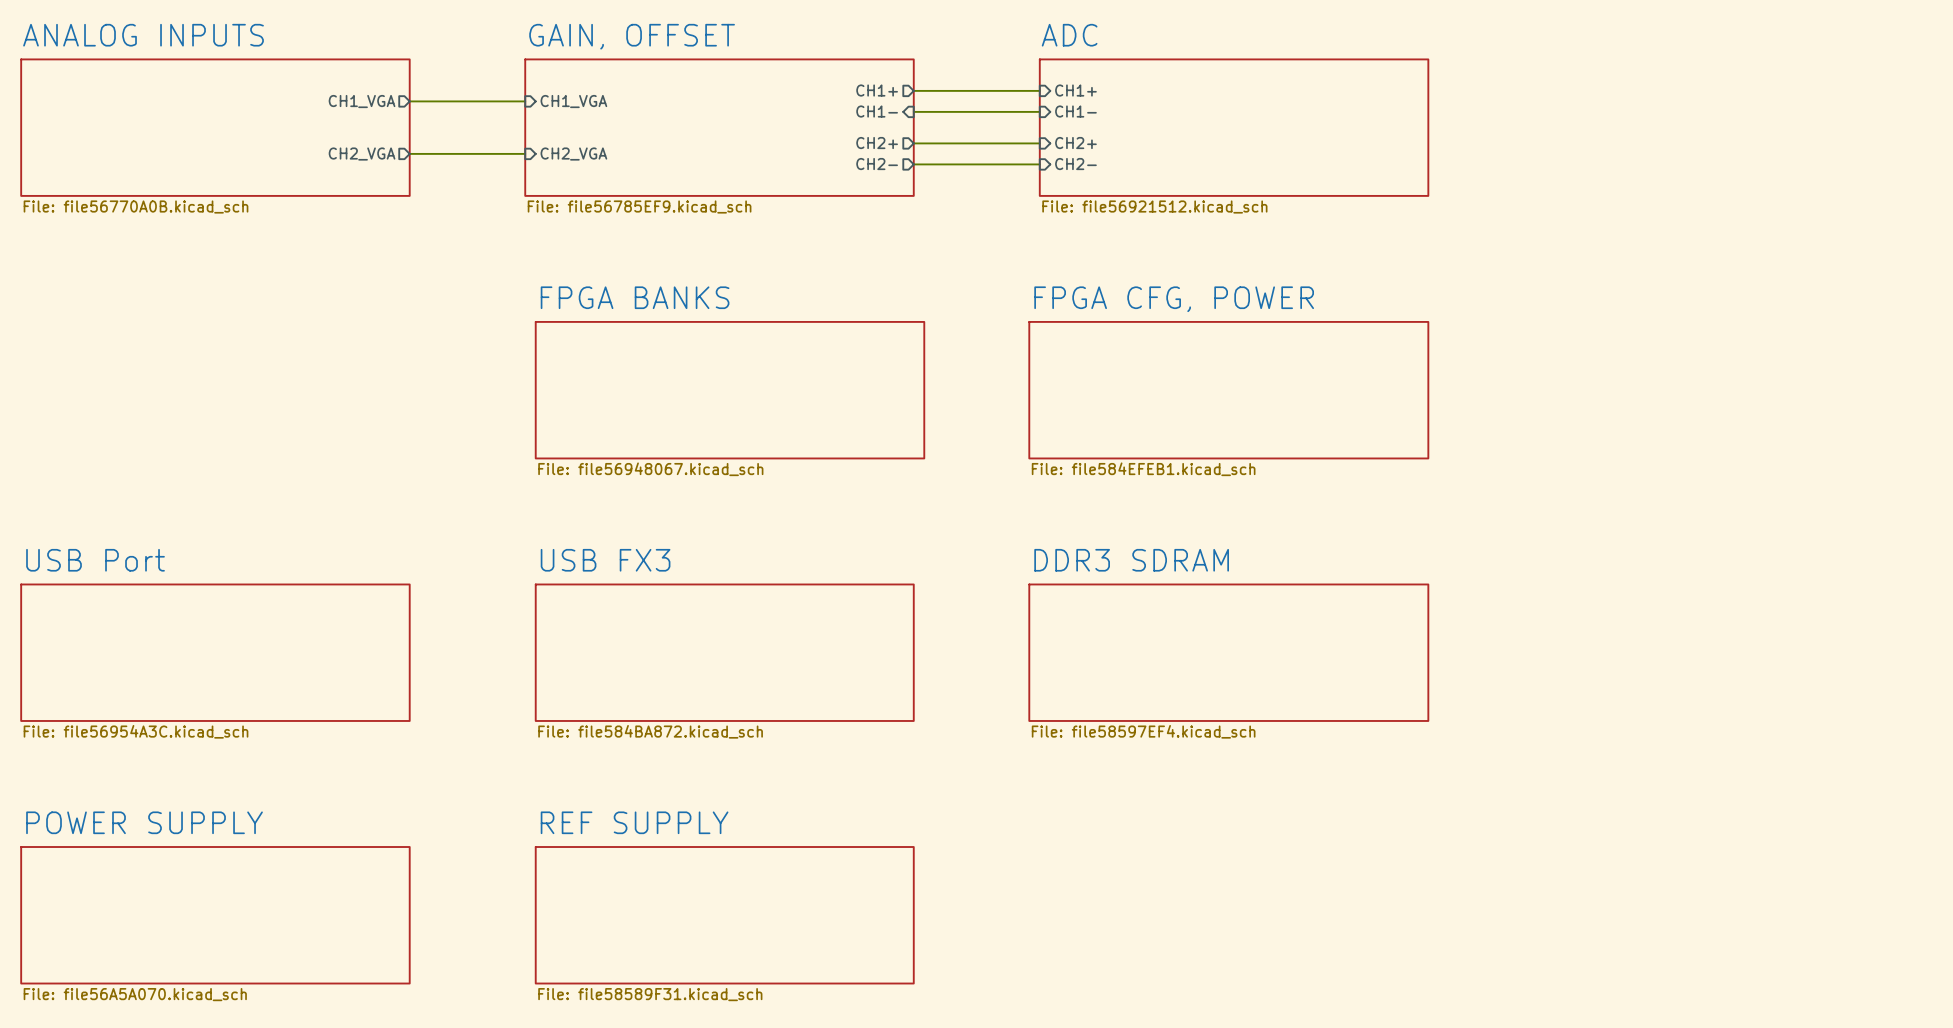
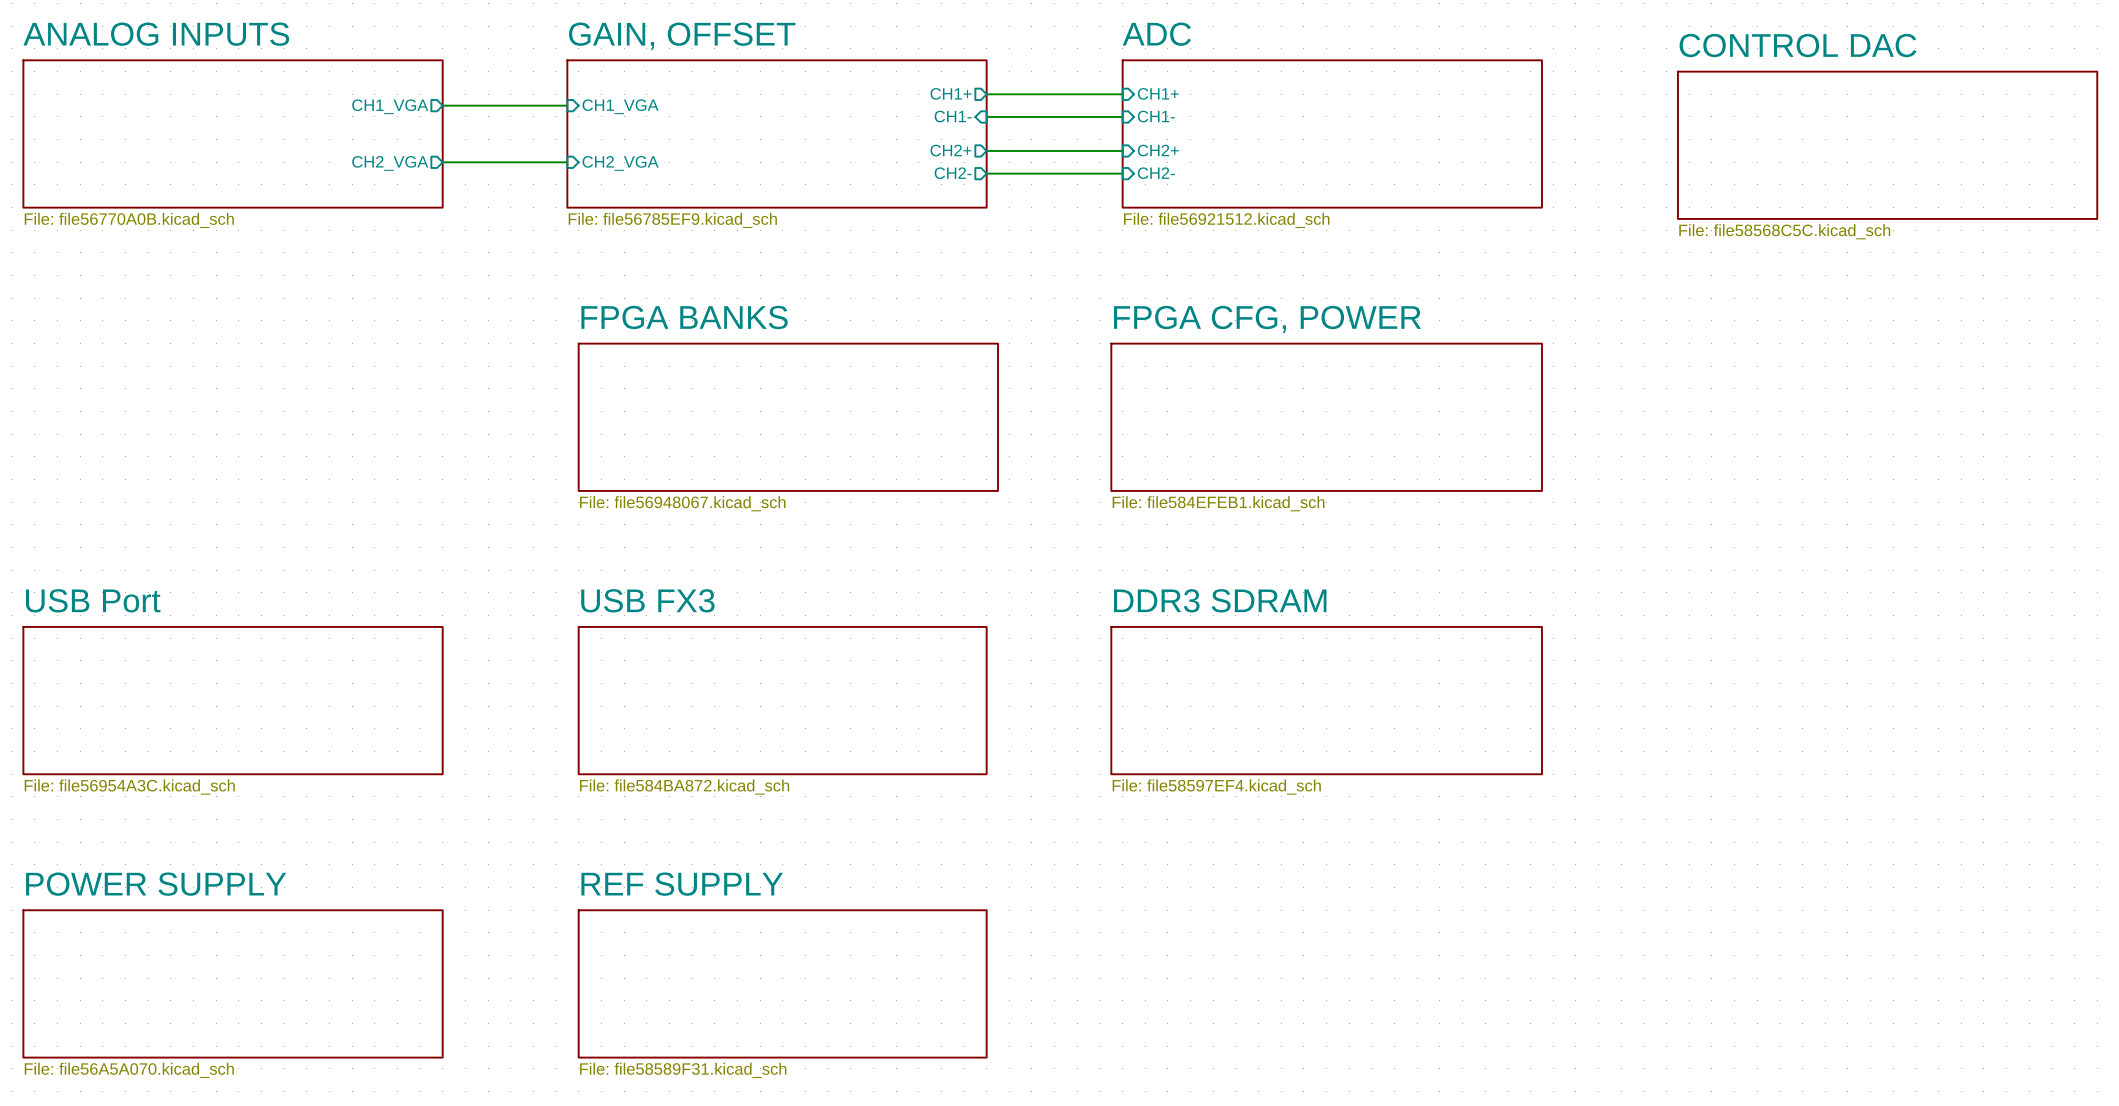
sheet CONTROL DAC: none -> File: file58568C5C.kicad_sch (1887, 145)

